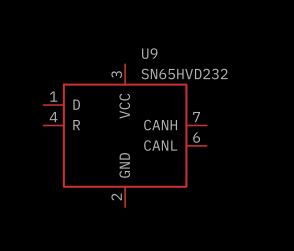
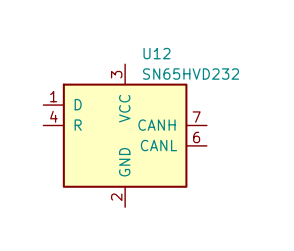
U9 name: U9 (149, 53) -> U12 (156, 53)

